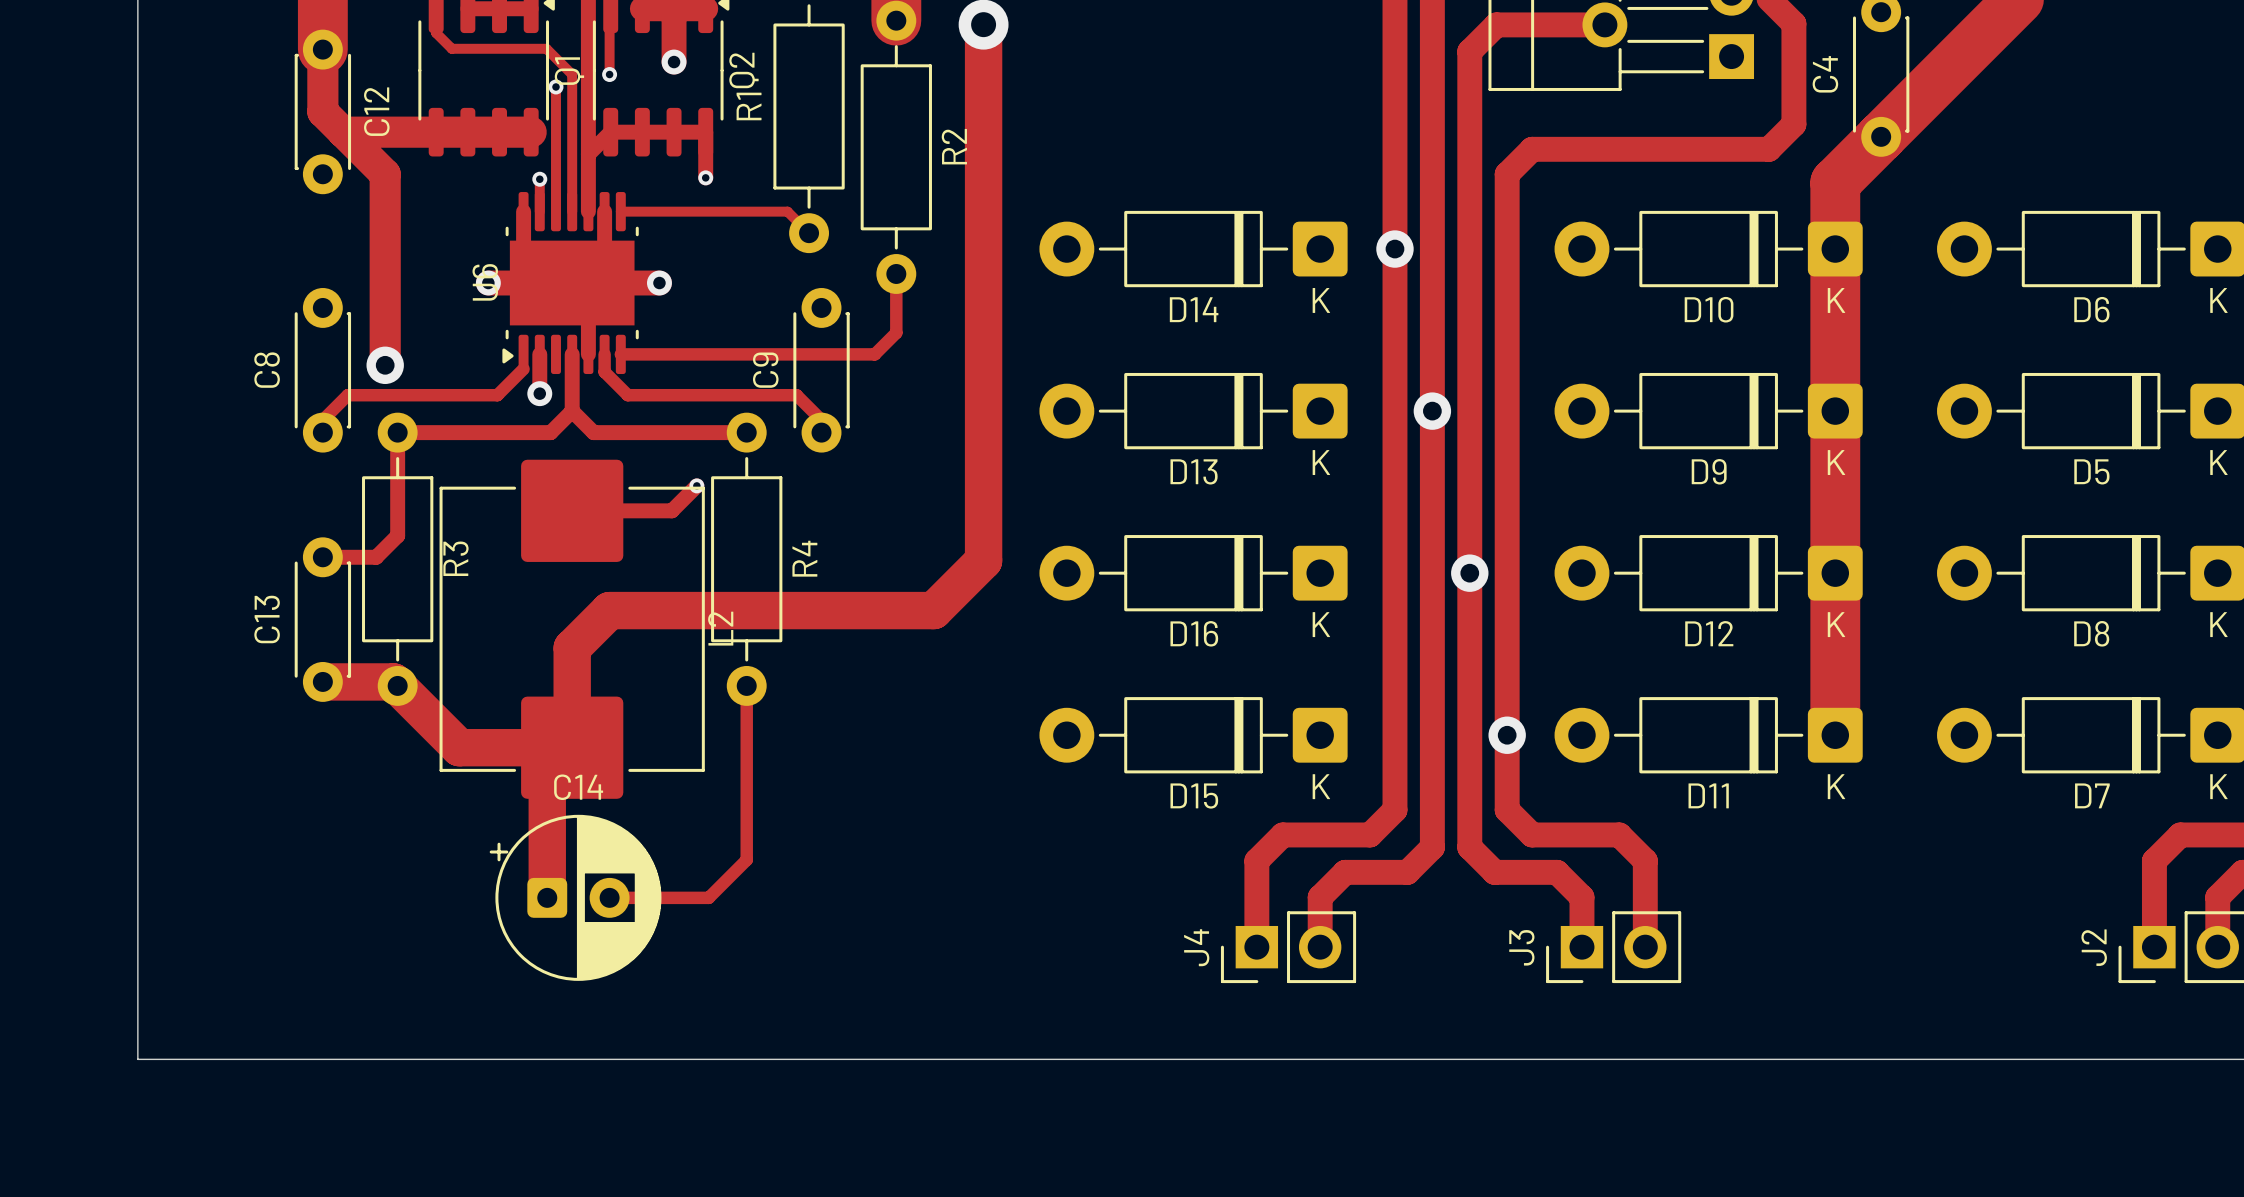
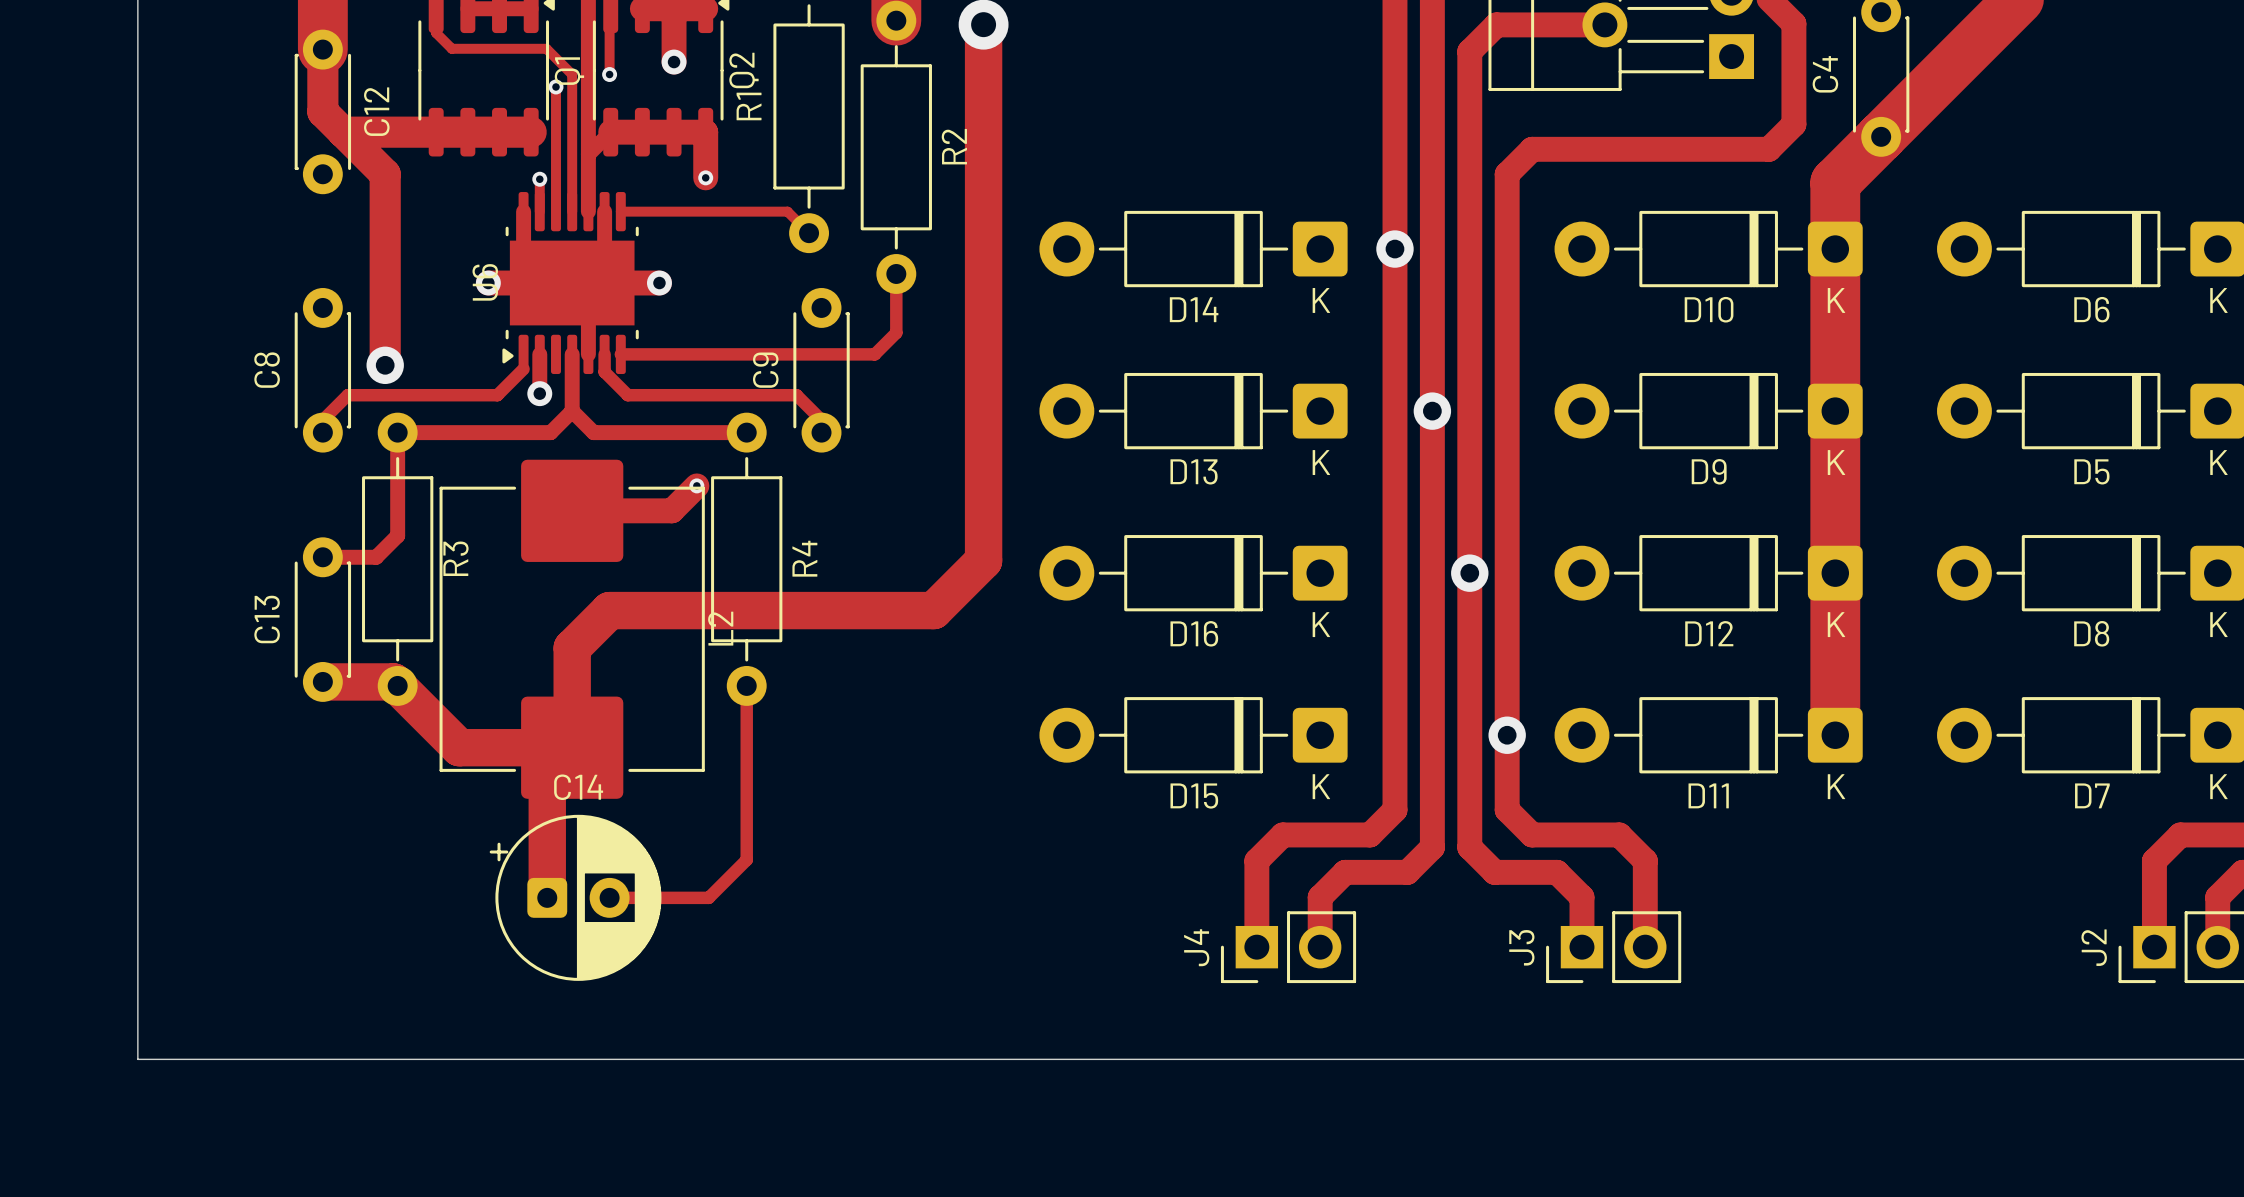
track width: thin (610, 132) (705, 132) (705, 177) -> thick (610, 132) (705, 132) (705, 177)
track width: thin (696, 485) (671, 510) (572, 510) -> thick (696, 485) (671, 510) (572, 510)

